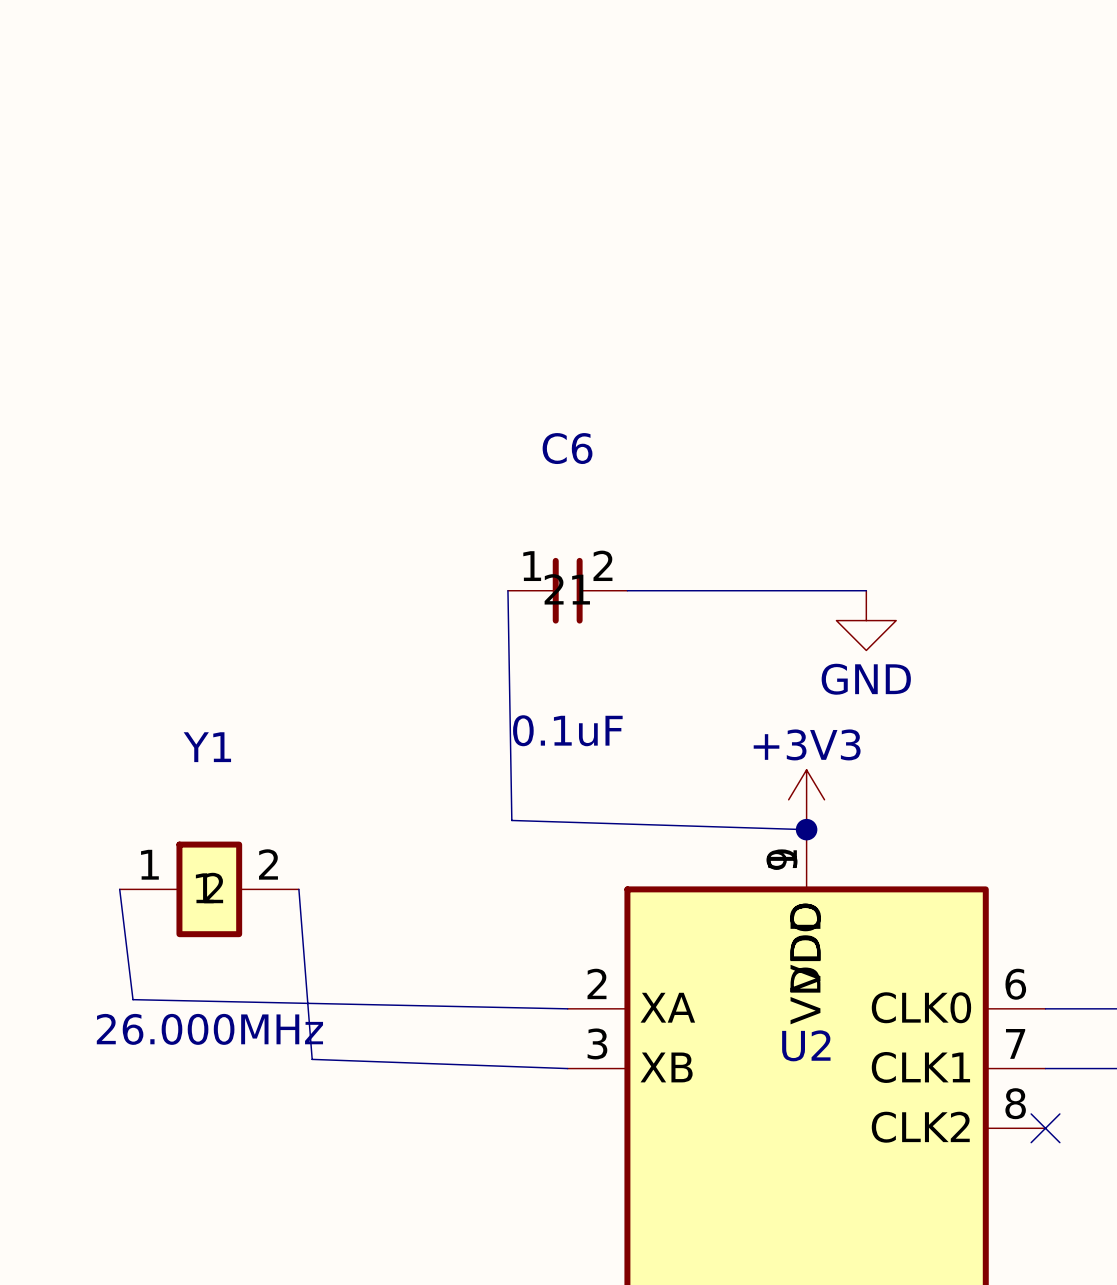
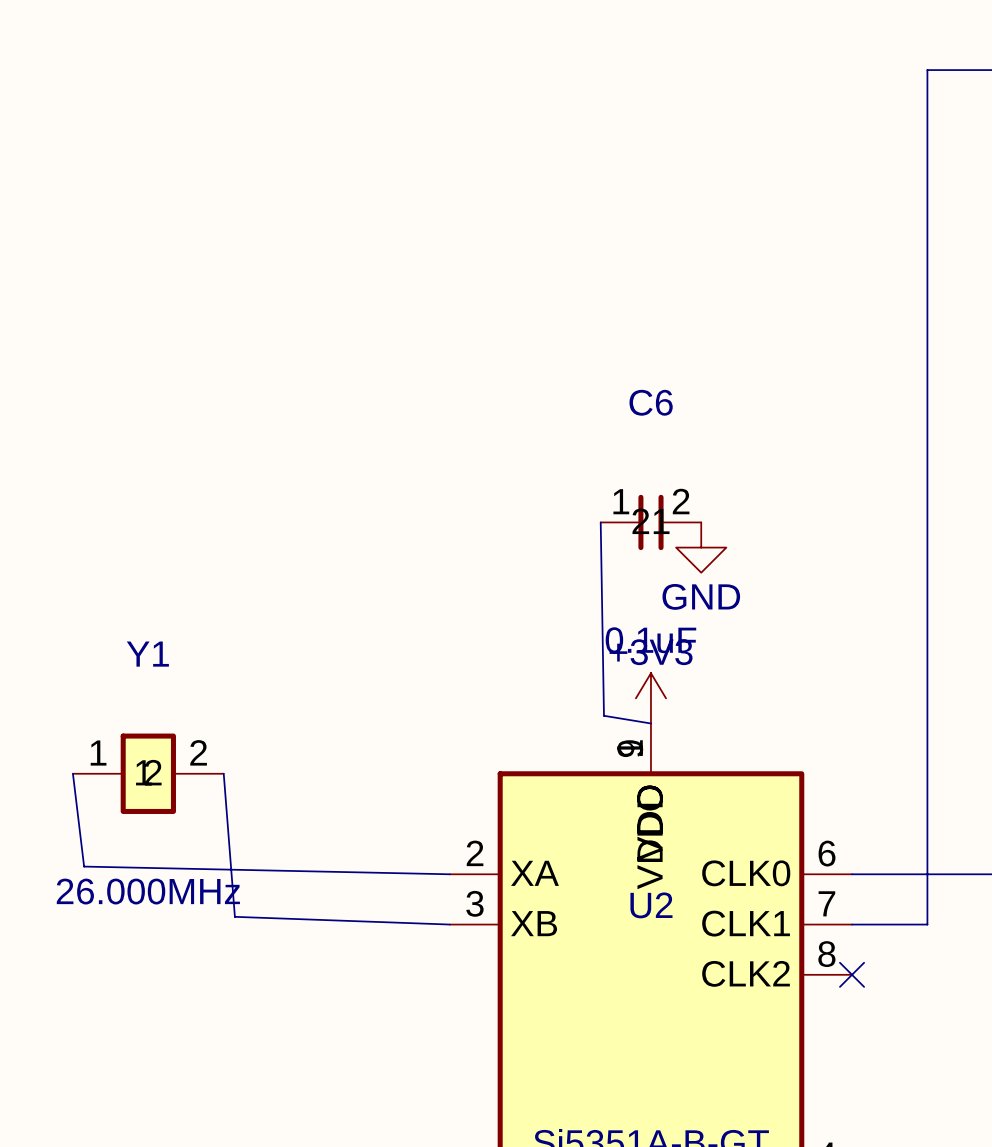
wire: (507, 590) (511, 820) (806, 829) -> (600, 522) (603, 715) (650, 723)
C6 position: (567, 590) -> (650, 522)
wire: (627, 590) (866, 590) -> none
junction: (806, 829) -> none

